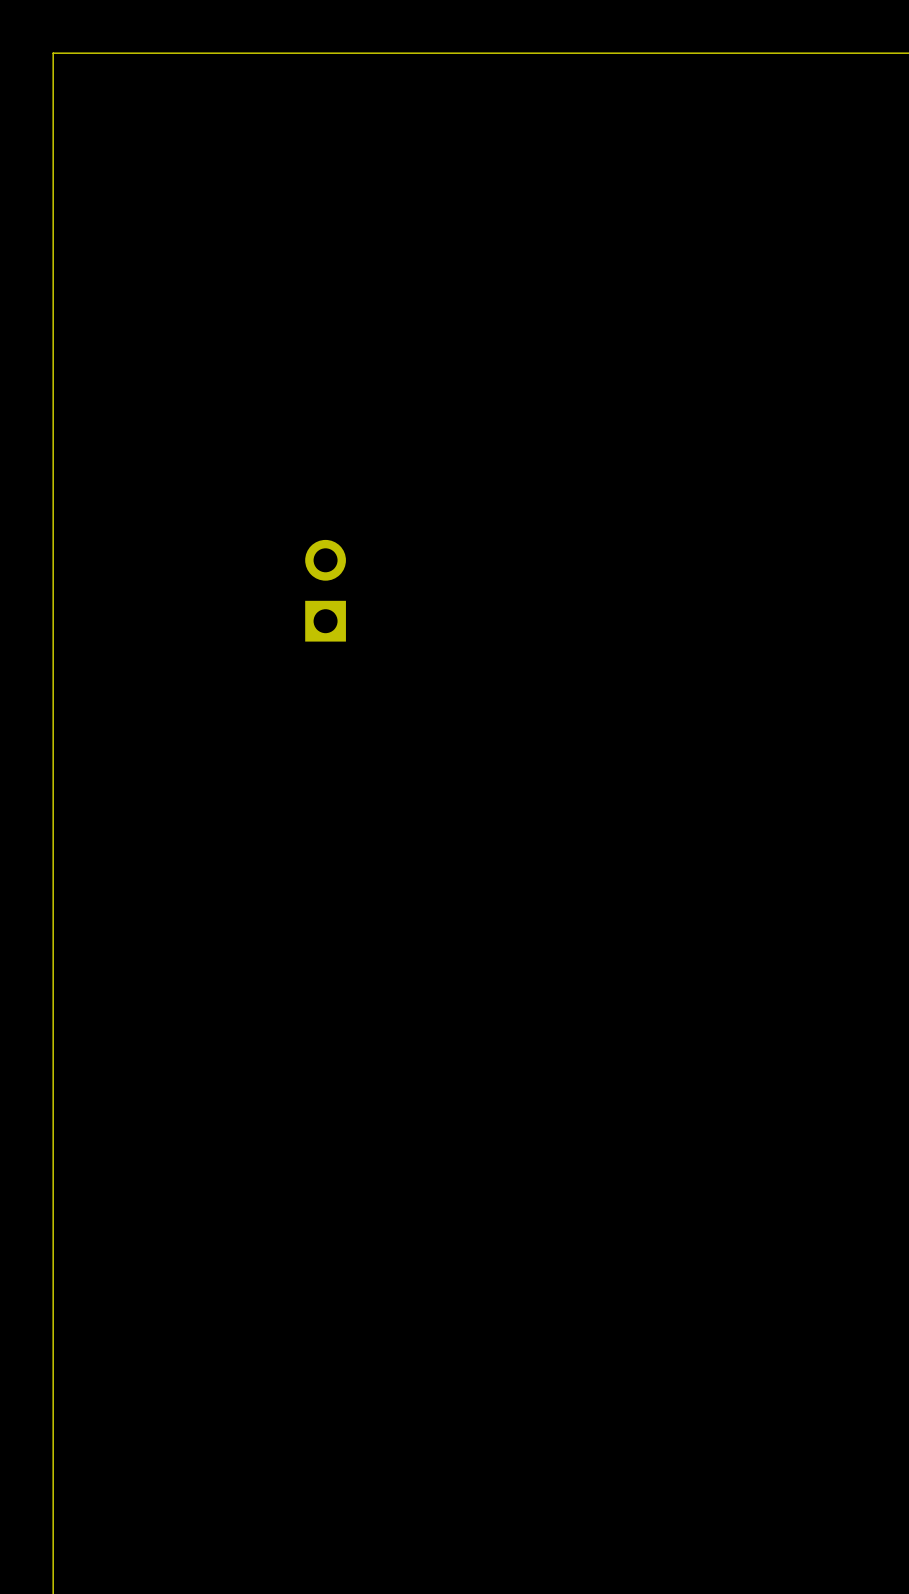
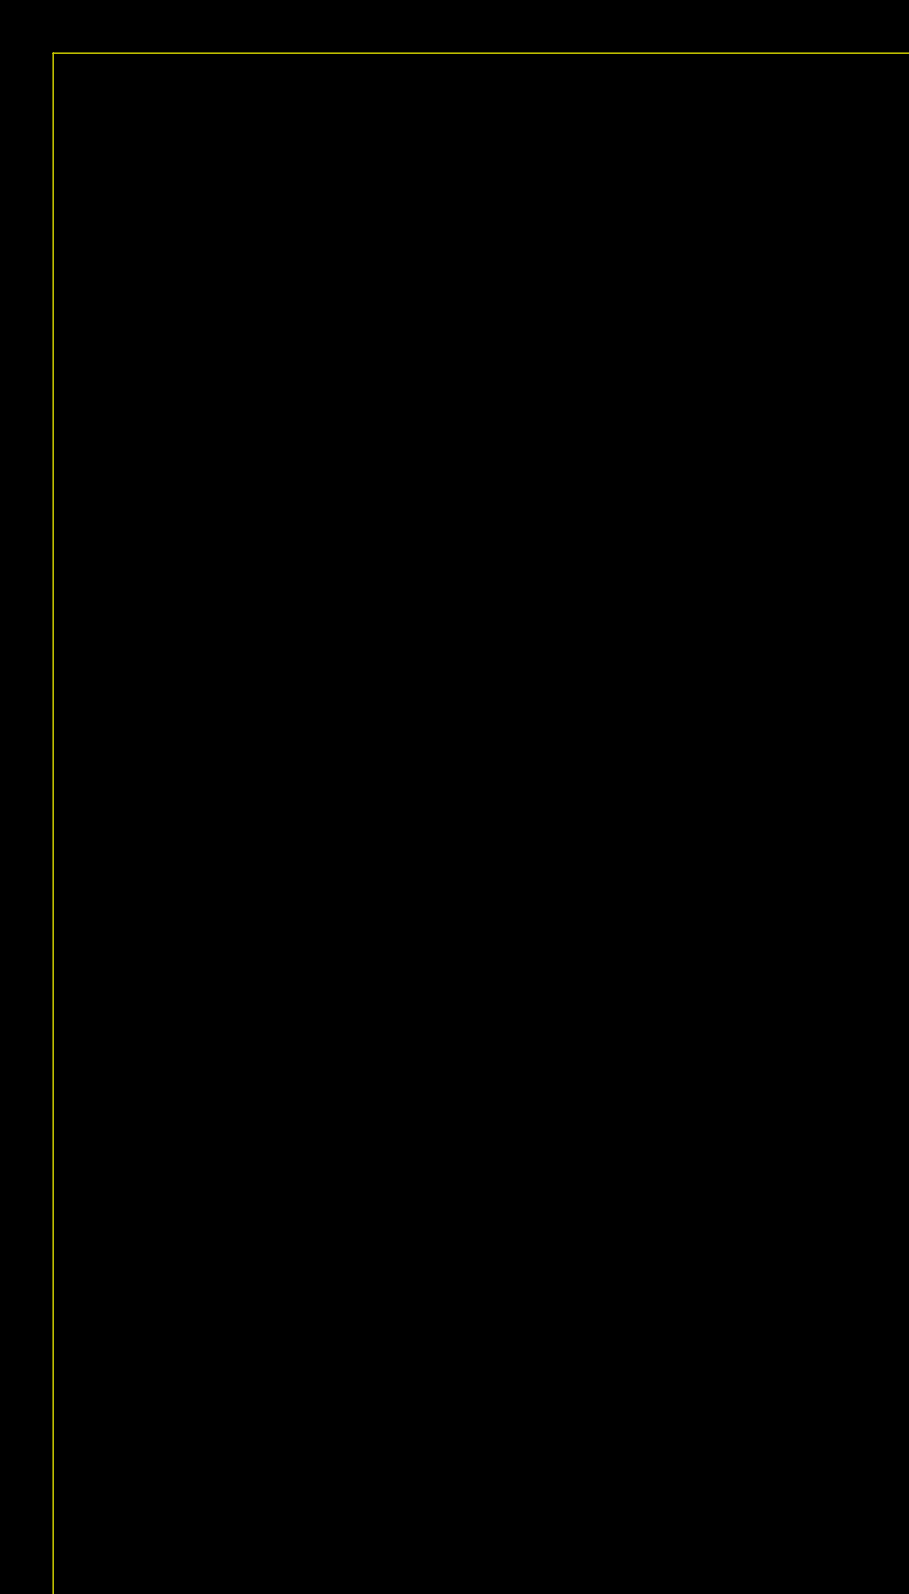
part: (325, 590) -> none

